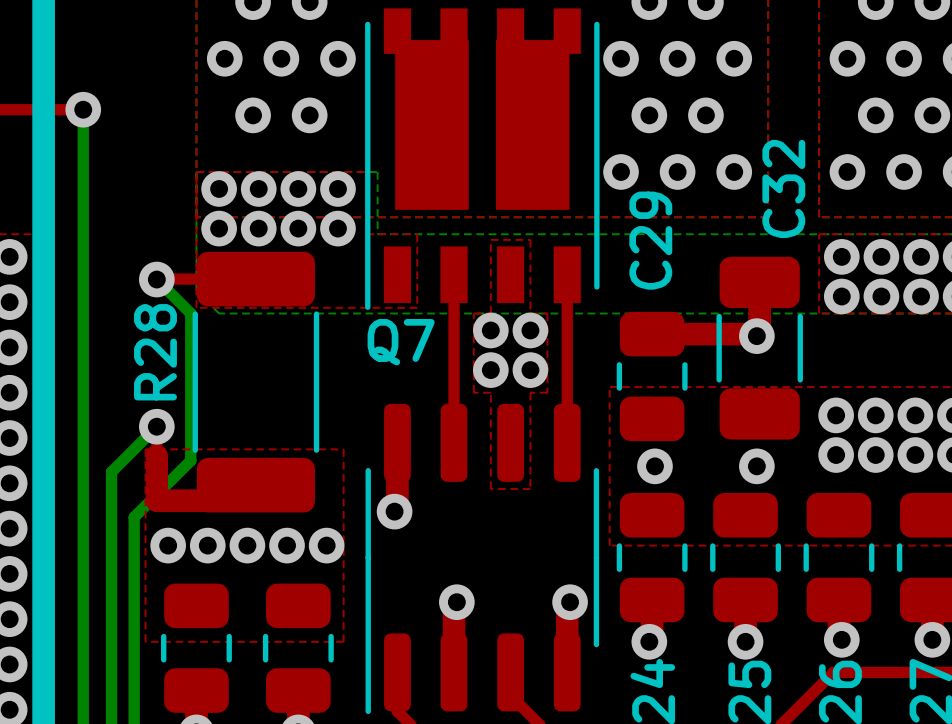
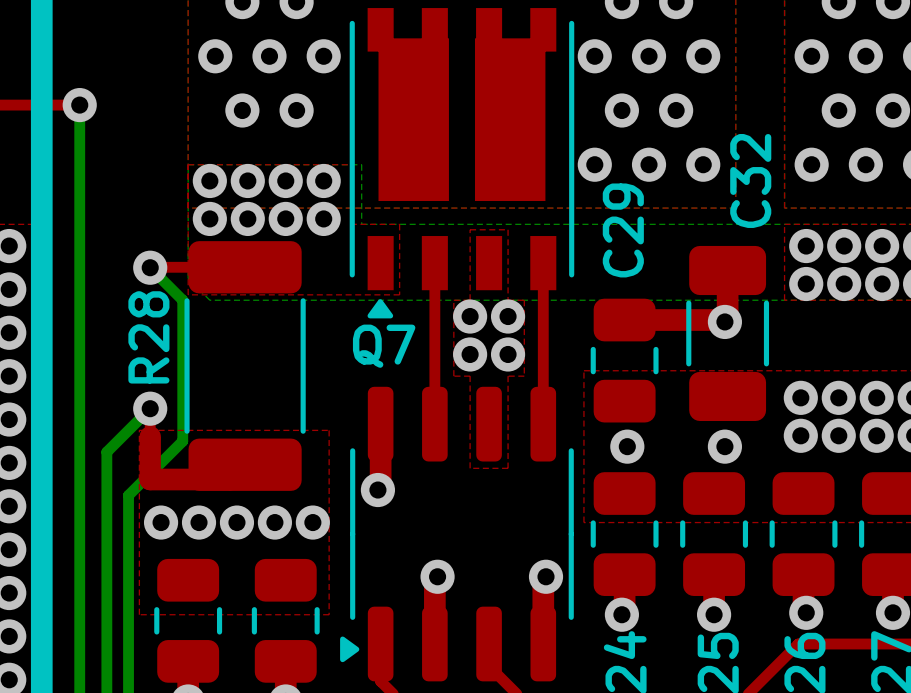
Q7 footprint: [365, 8, 600, 310] -> [349, 8, 575, 319]
part footprint: [365, 403, 600, 715] -> [340, 386, 574, 682]

